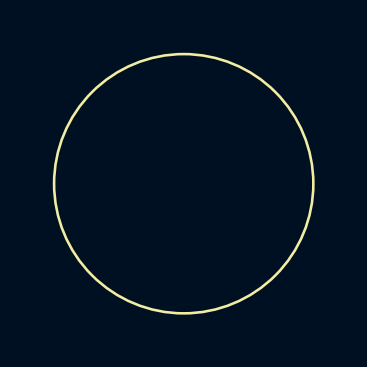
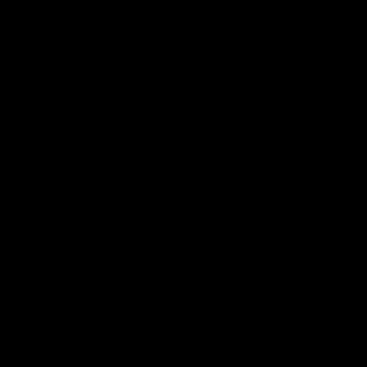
drawing: [52, 52, 315, 315] -> none

